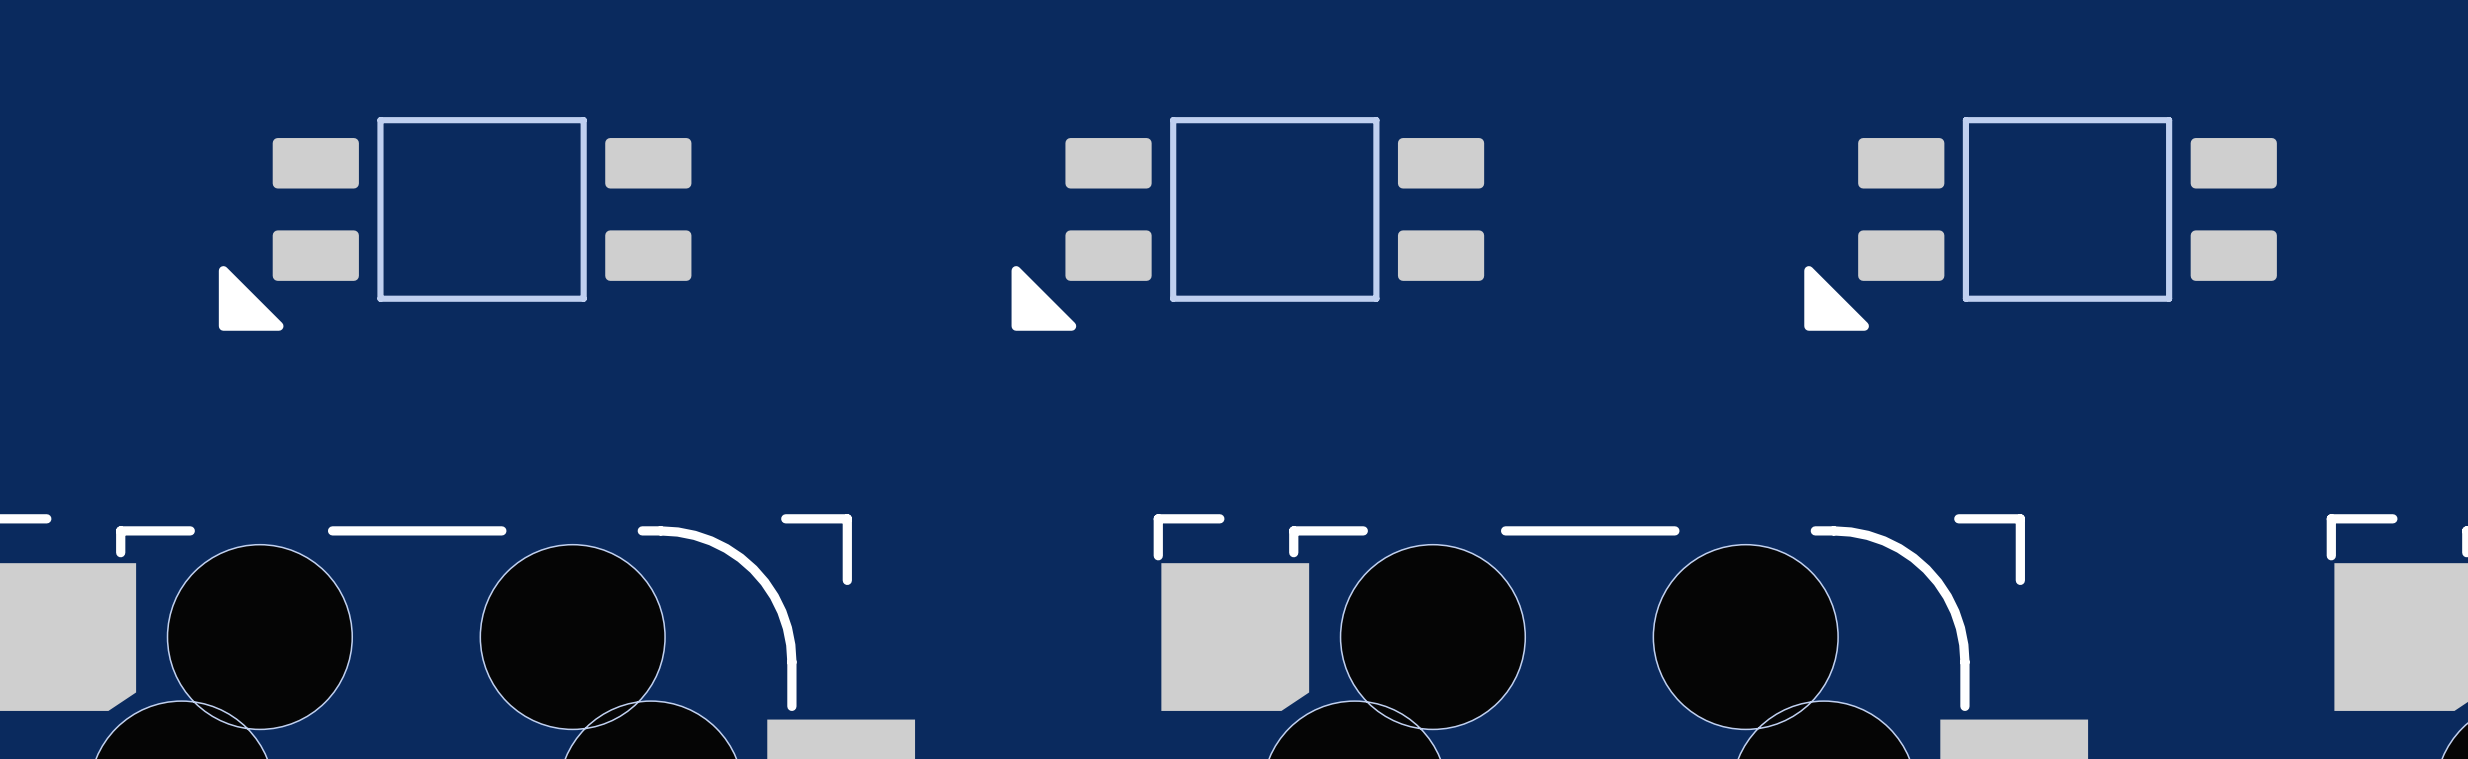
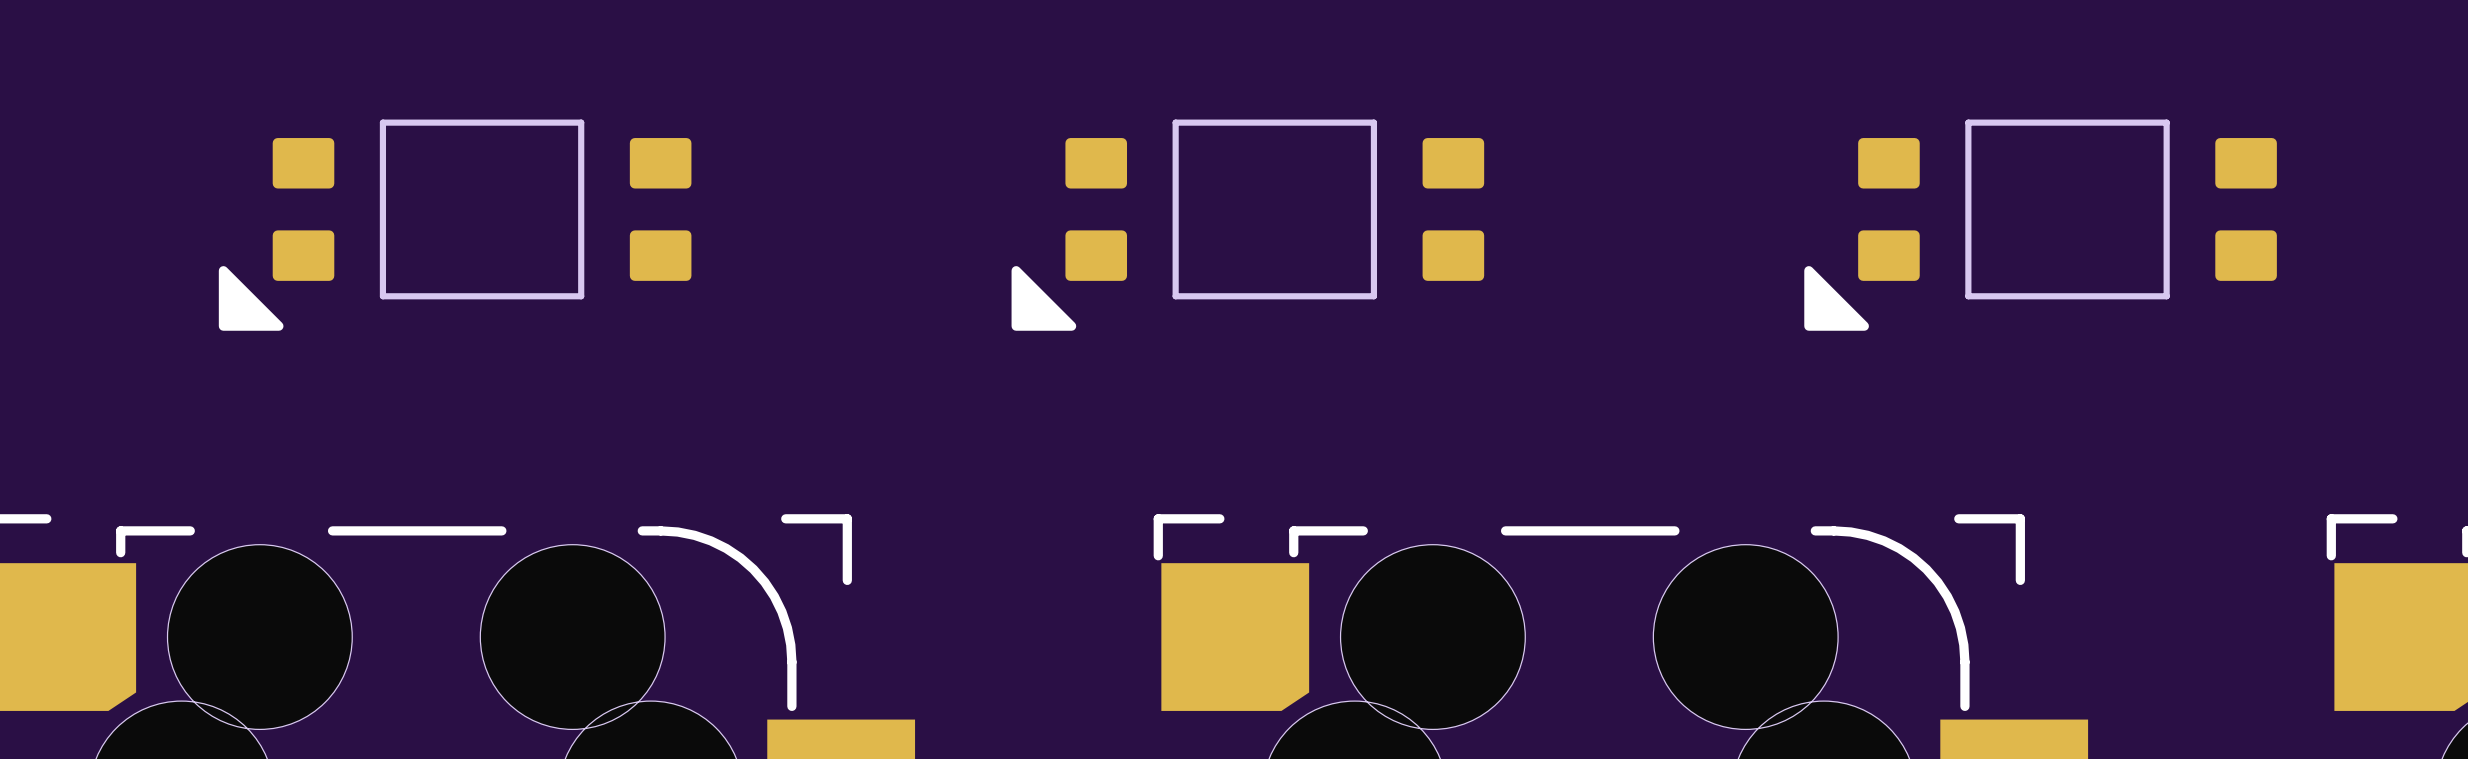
part footprint: [218, 117, 692, 331] -> [218, 119, 692, 331]
part footprint: [1011, 117, 1485, 331] -> [1011, 119, 1485, 331]
part footprint: [1804, 117, 2277, 331] -> [1804, 119, 2277, 331]

